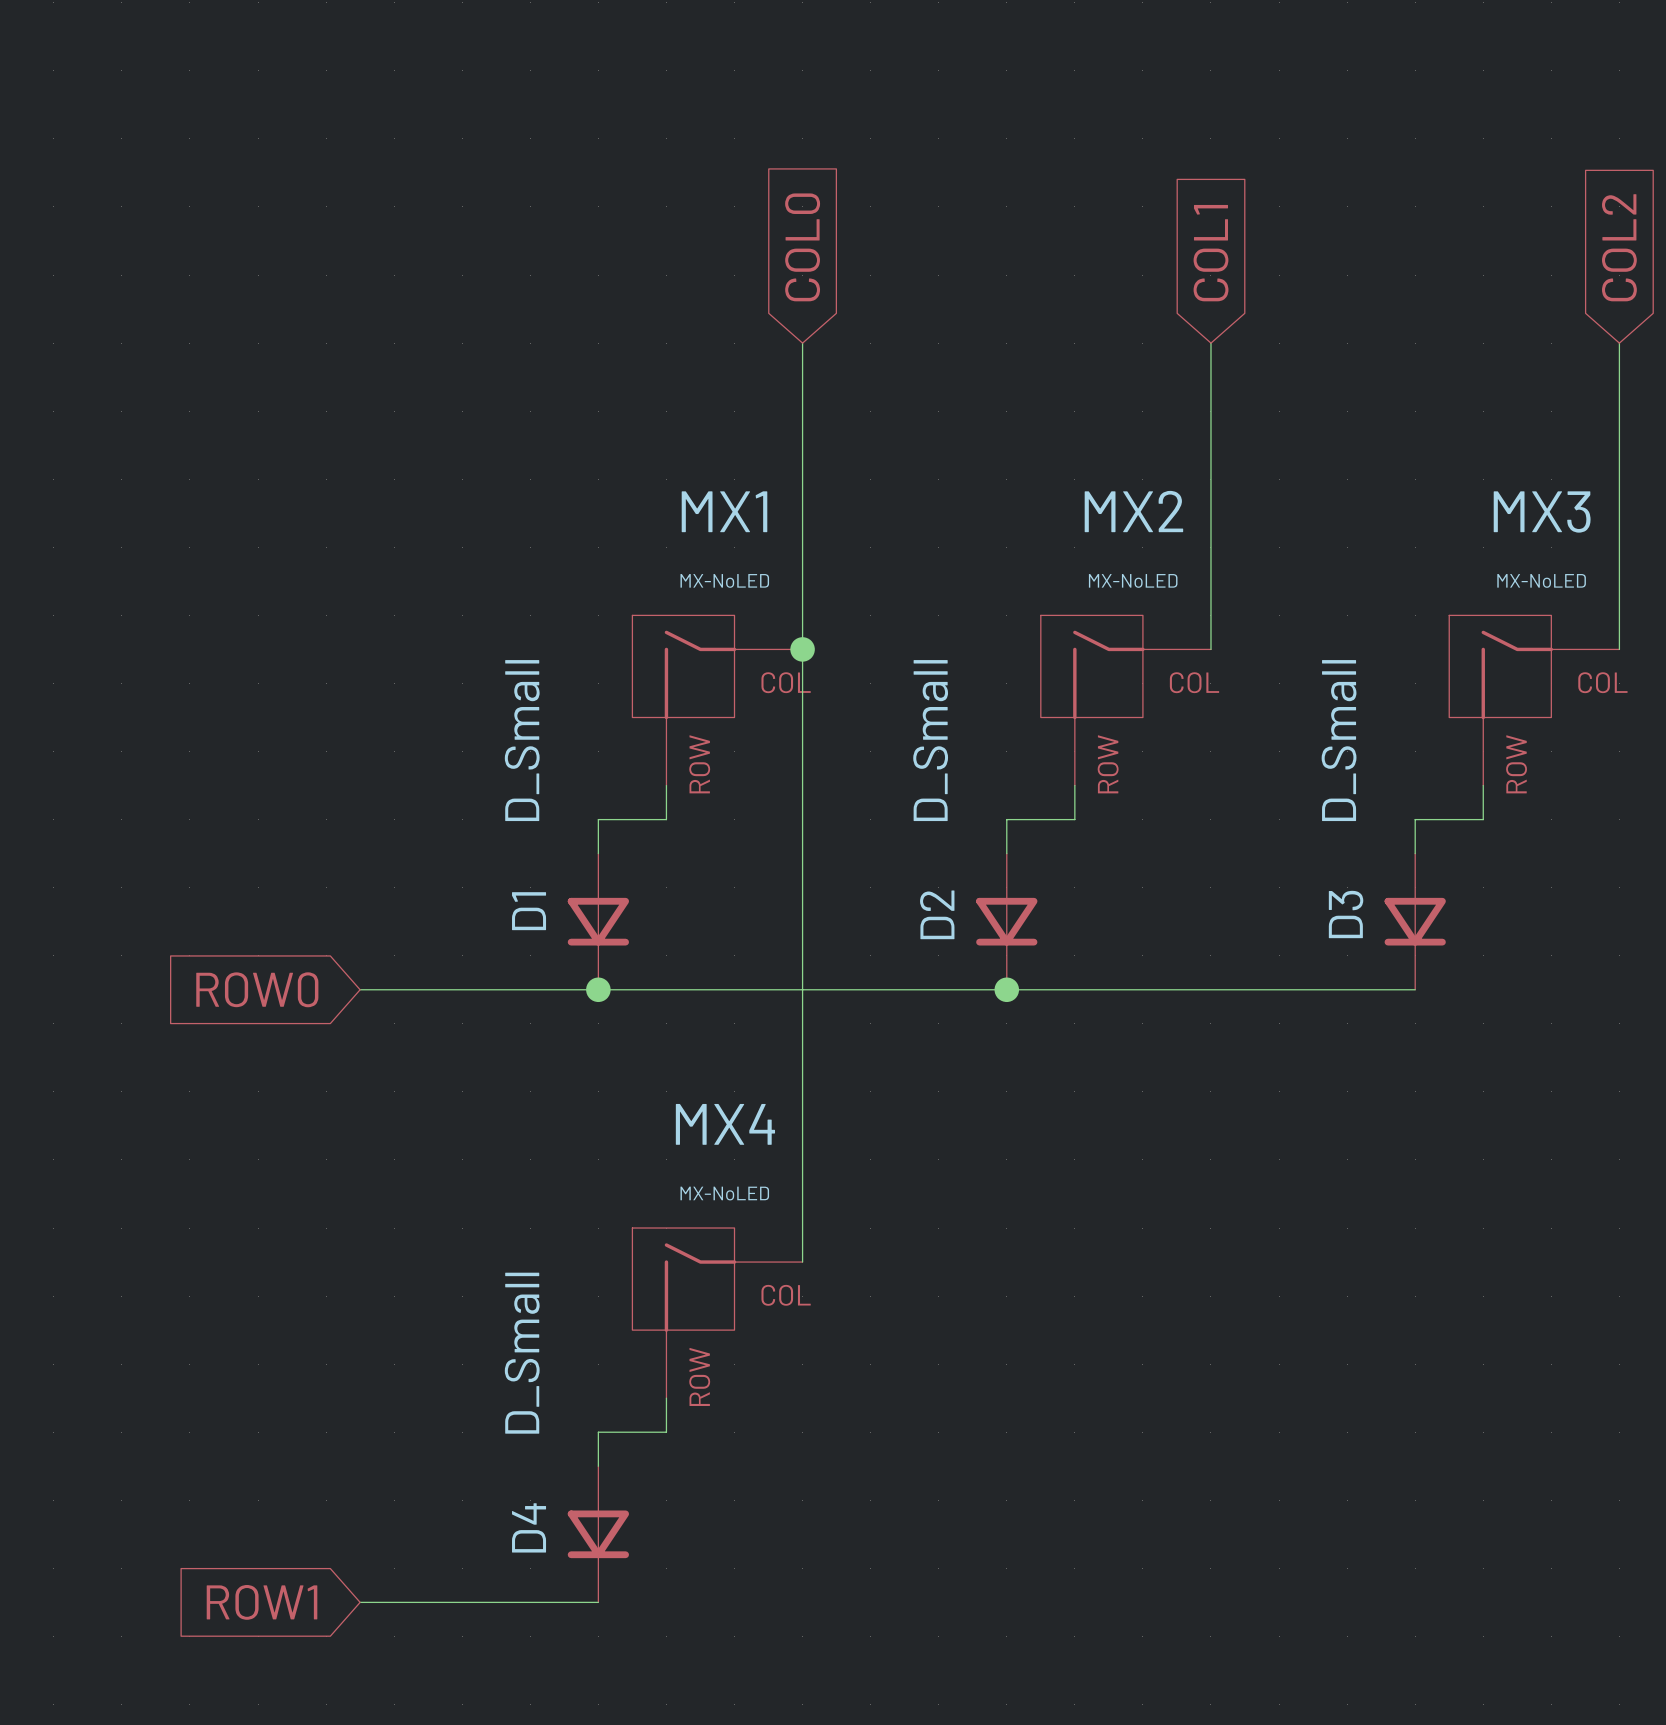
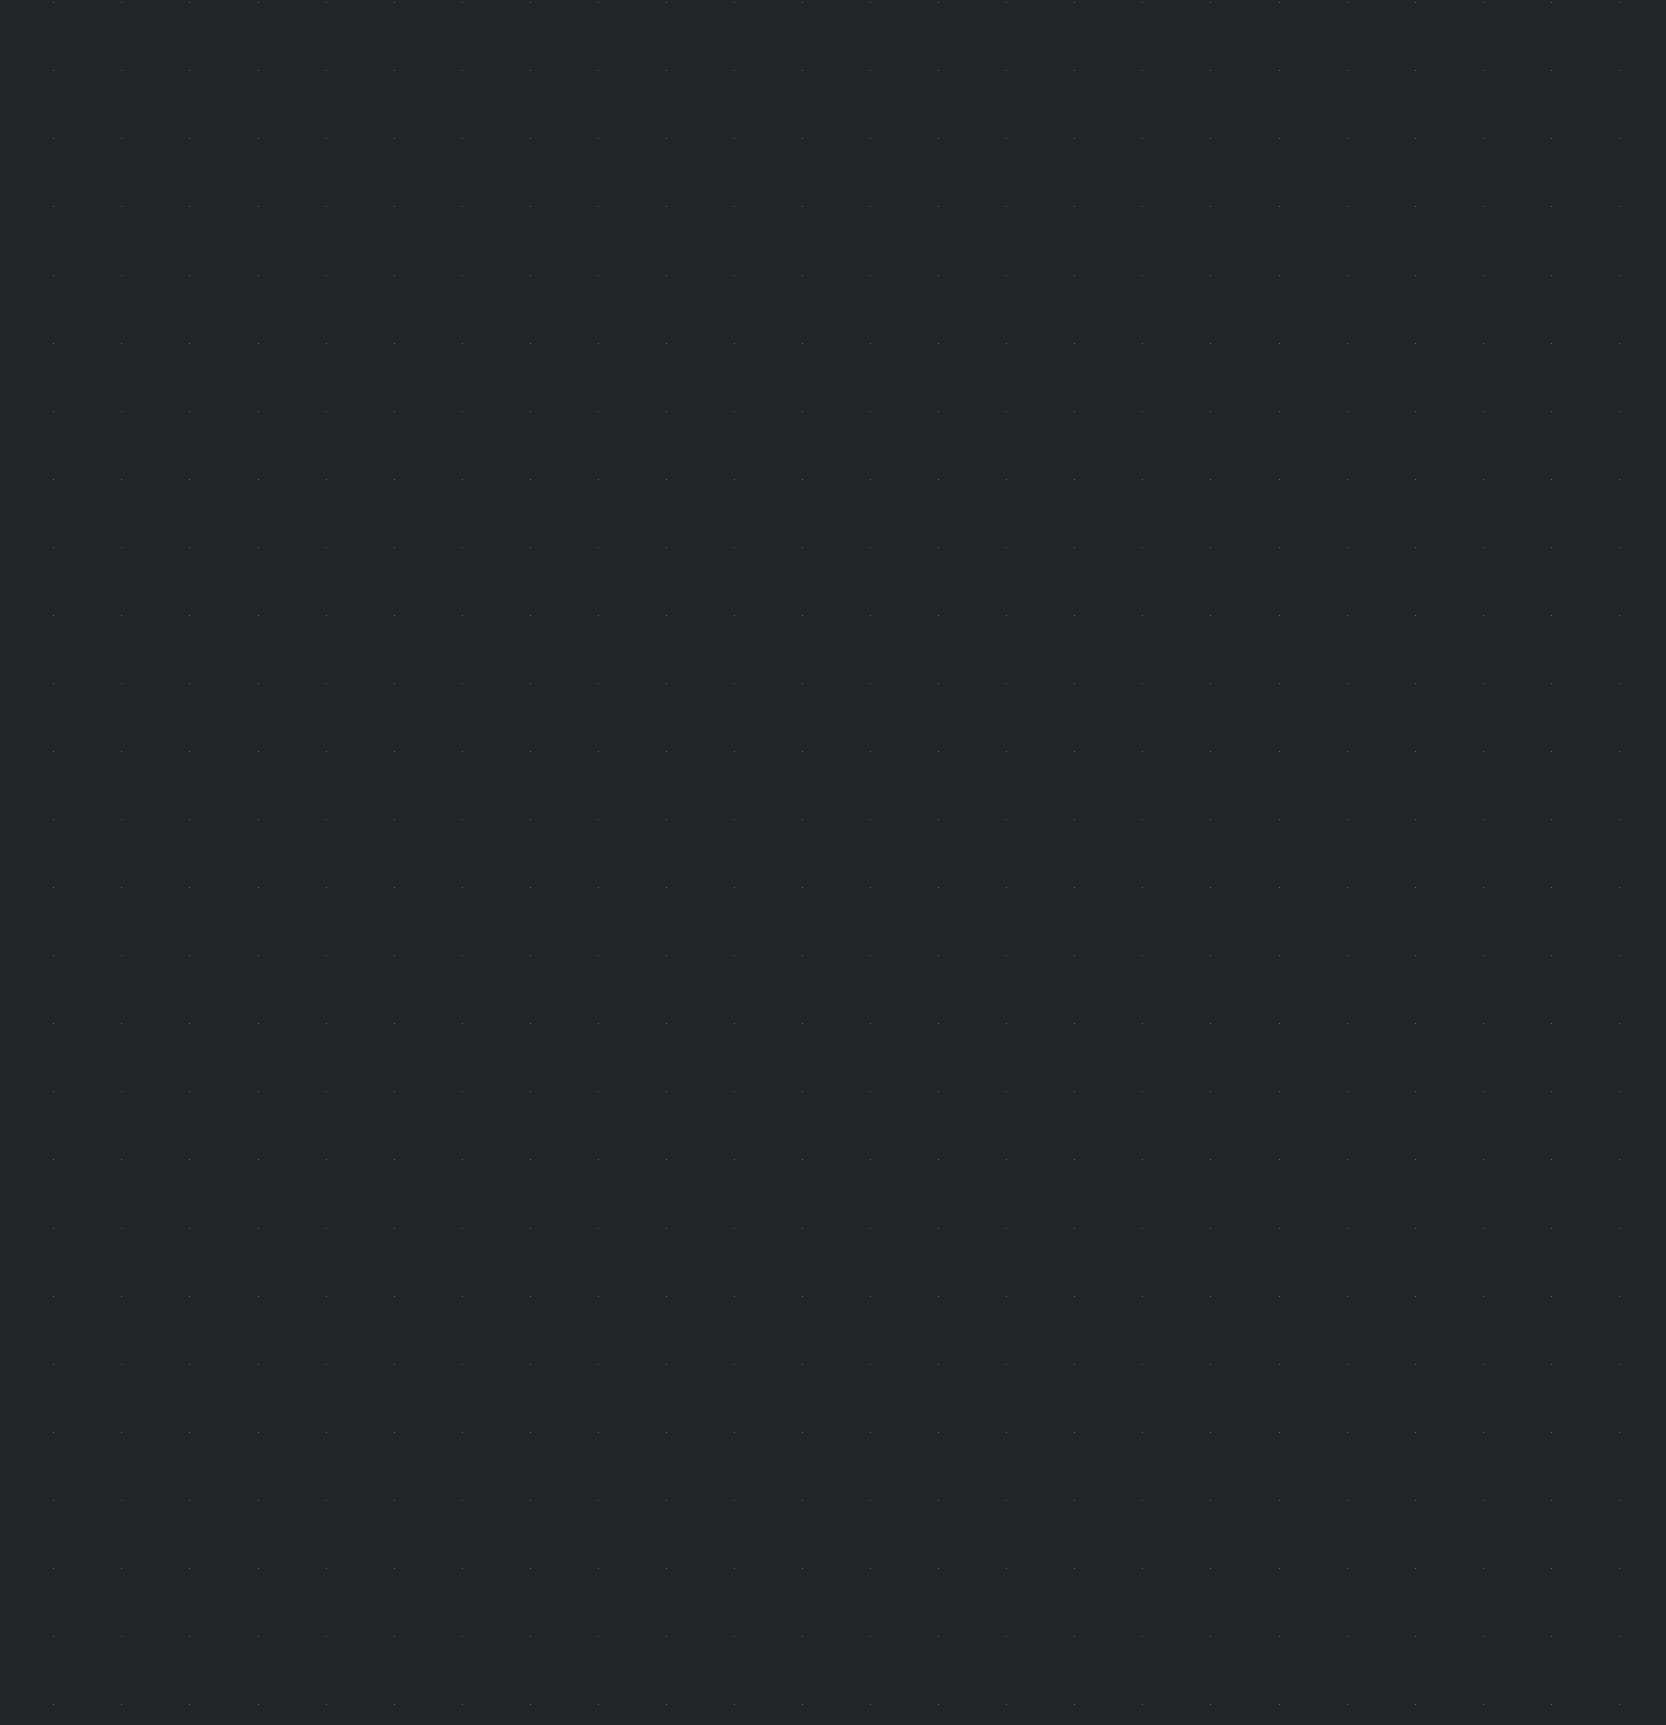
global label: COL0 (802, 247) -> none
global label: COL2 (1619, 247) -> none
global label: COL1 (1211, 253) -> none
wire: (802, 343) (802, 1262) -> none
wire: (1210, 343) (1210, 649) -> none
wire: (1619, 343) (1619, 649) -> none
junction: (802, 649) -> none
MX1: MX-NoLED (717, 700) -> none
MX2: MX-NoLED (1125, 700) -> none
MX3: MX-NoLED (1534, 700) -> none
wire: (666, 785) (666, 819) (598, 819) (598, 853) -> none
wire: (1074, 785) (1074, 819) (1006, 819) (1006, 853) -> none
wire: (1483, 785) (1483, 819) (1415, 819) (1415, 853) -> none
D1: D_Small (598, 921) -> none
D2: D_Small (1006, 921) -> none
D3: D_Small (1415, 921) -> none
global label: ROW0 (257, 989) -> none
wire: (360, 989) (1415, 989) -> none
junction: (598, 989) -> none
junction: (1006, 989) -> none
MX4: MX-NoLED (717, 1313) -> none
wire: (666, 1398) (666, 1432) (598, 1432) (598, 1466) -> none
D4: D_Small (598, 1534) -> none
global label: ROW1 (262, 1602) -> none
wire: (360, 1602) (598, 1602) -> none

